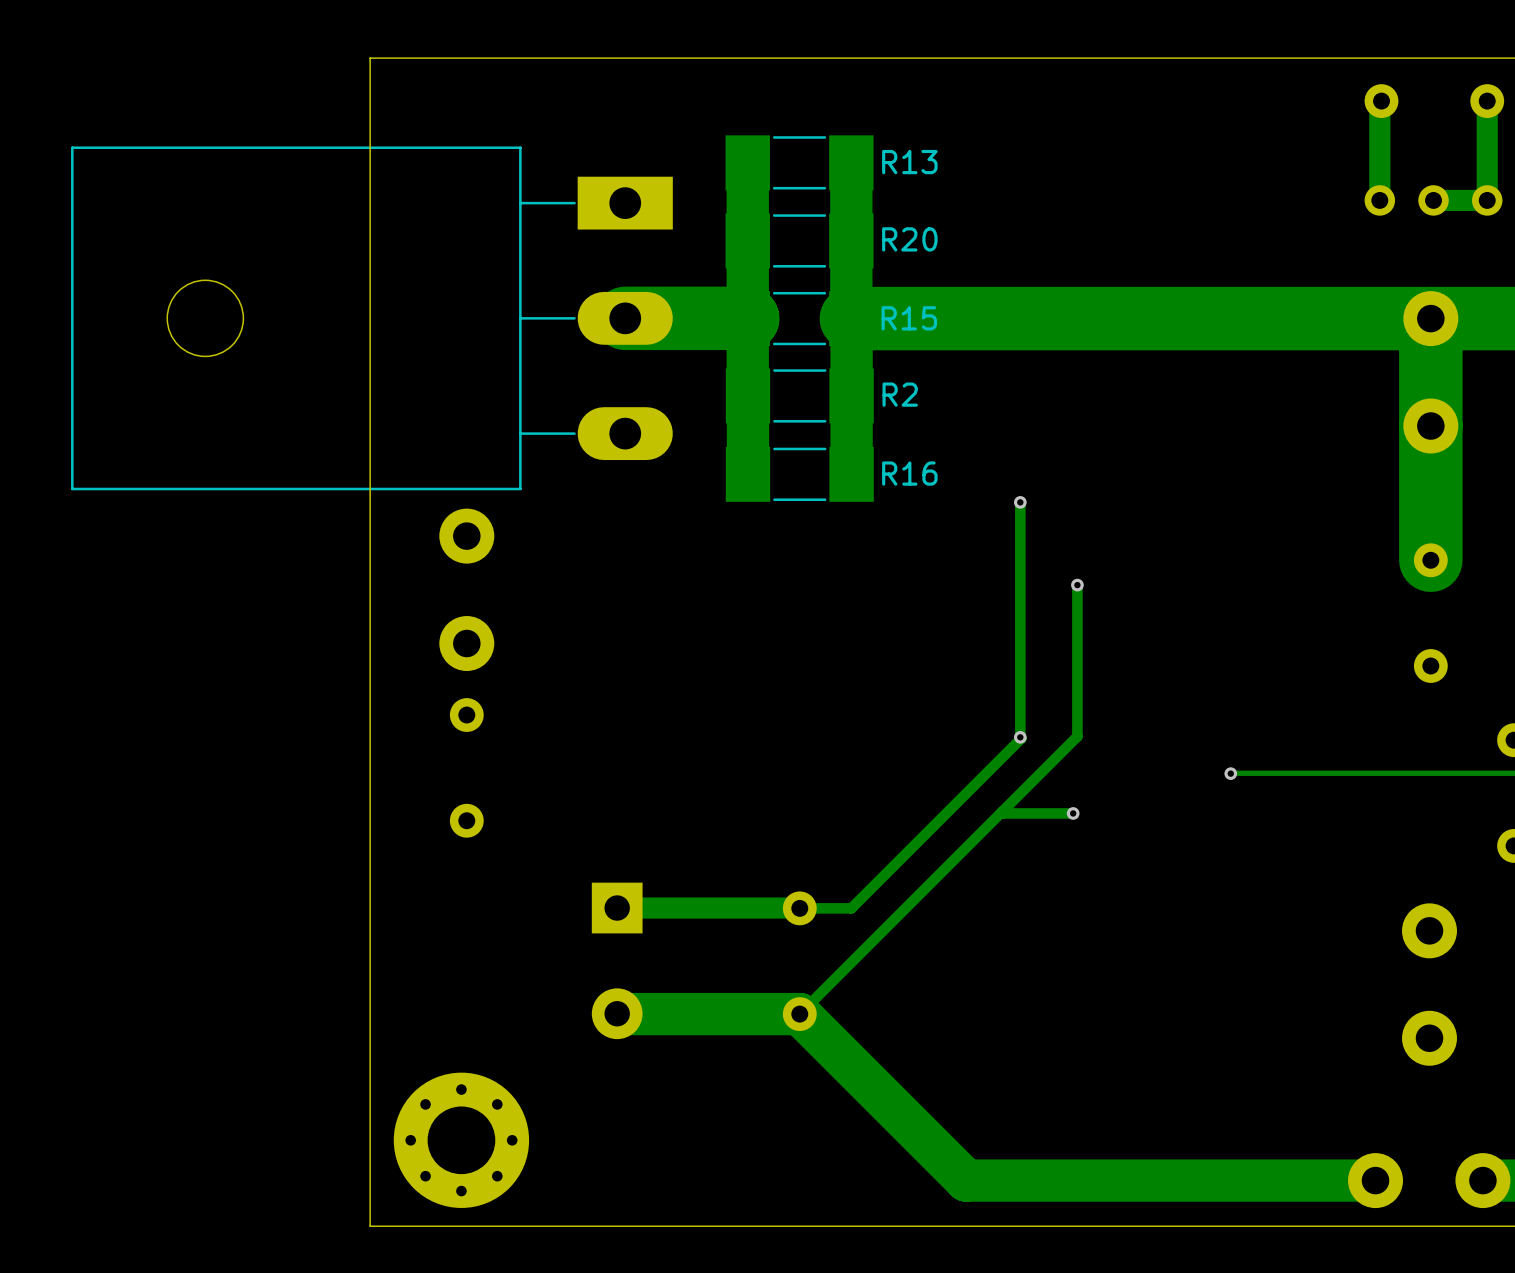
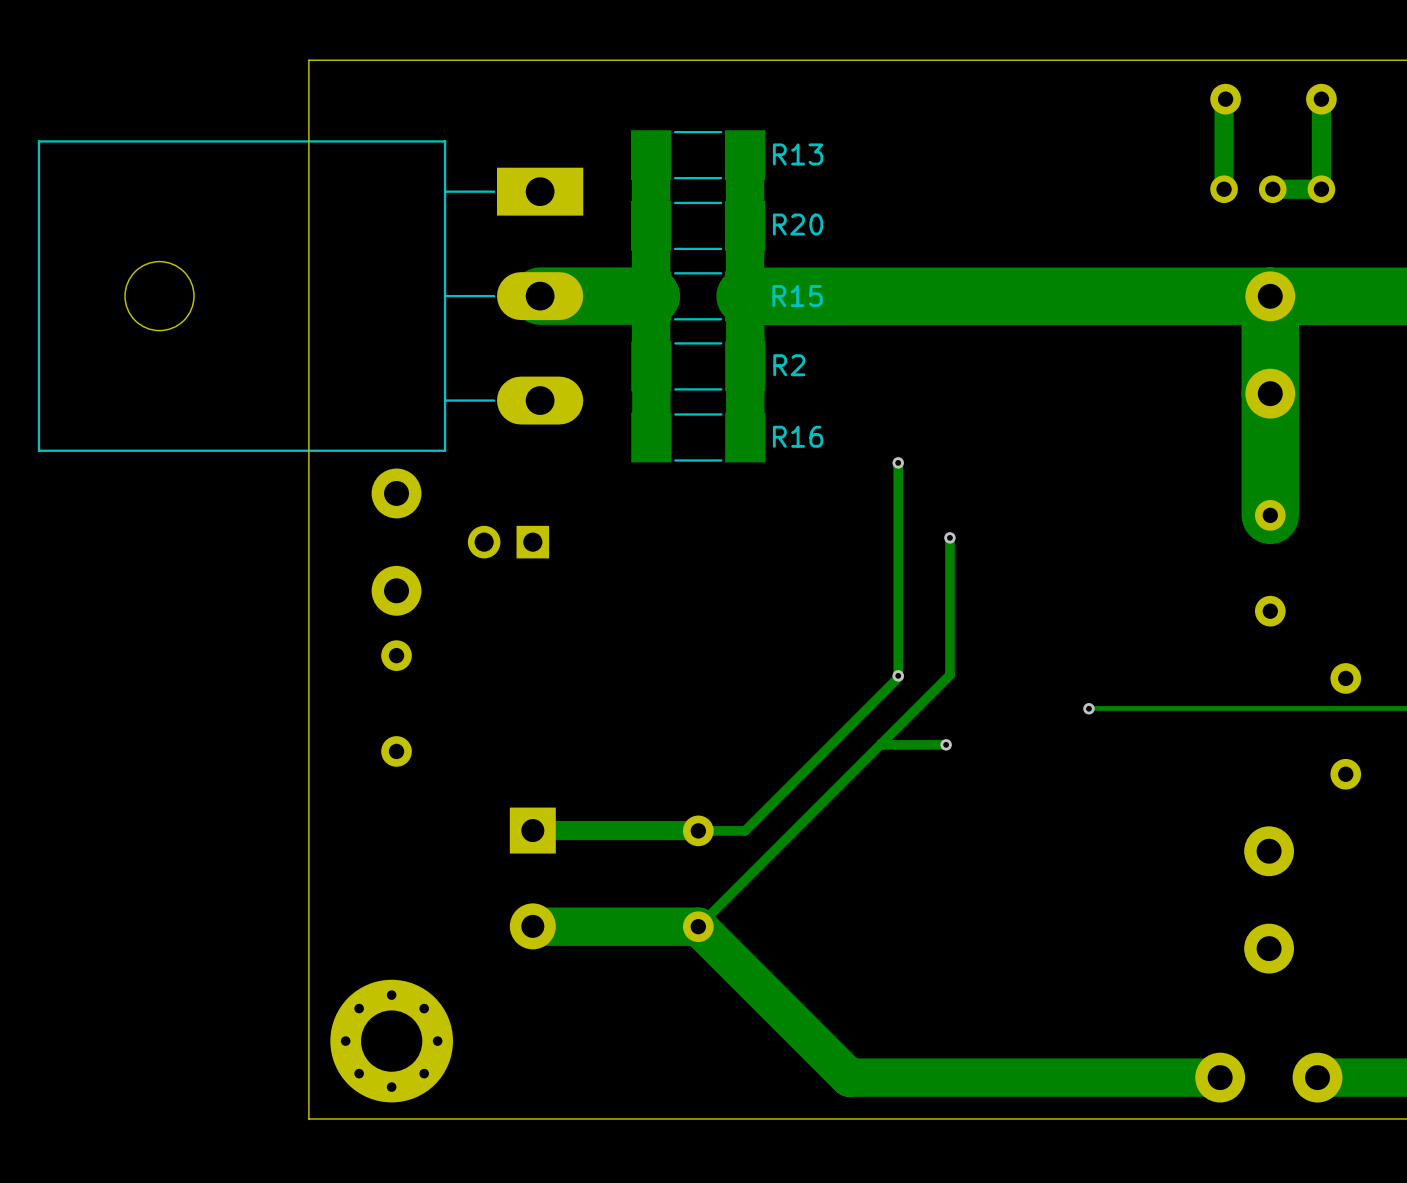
part: none -> (508, 542)

